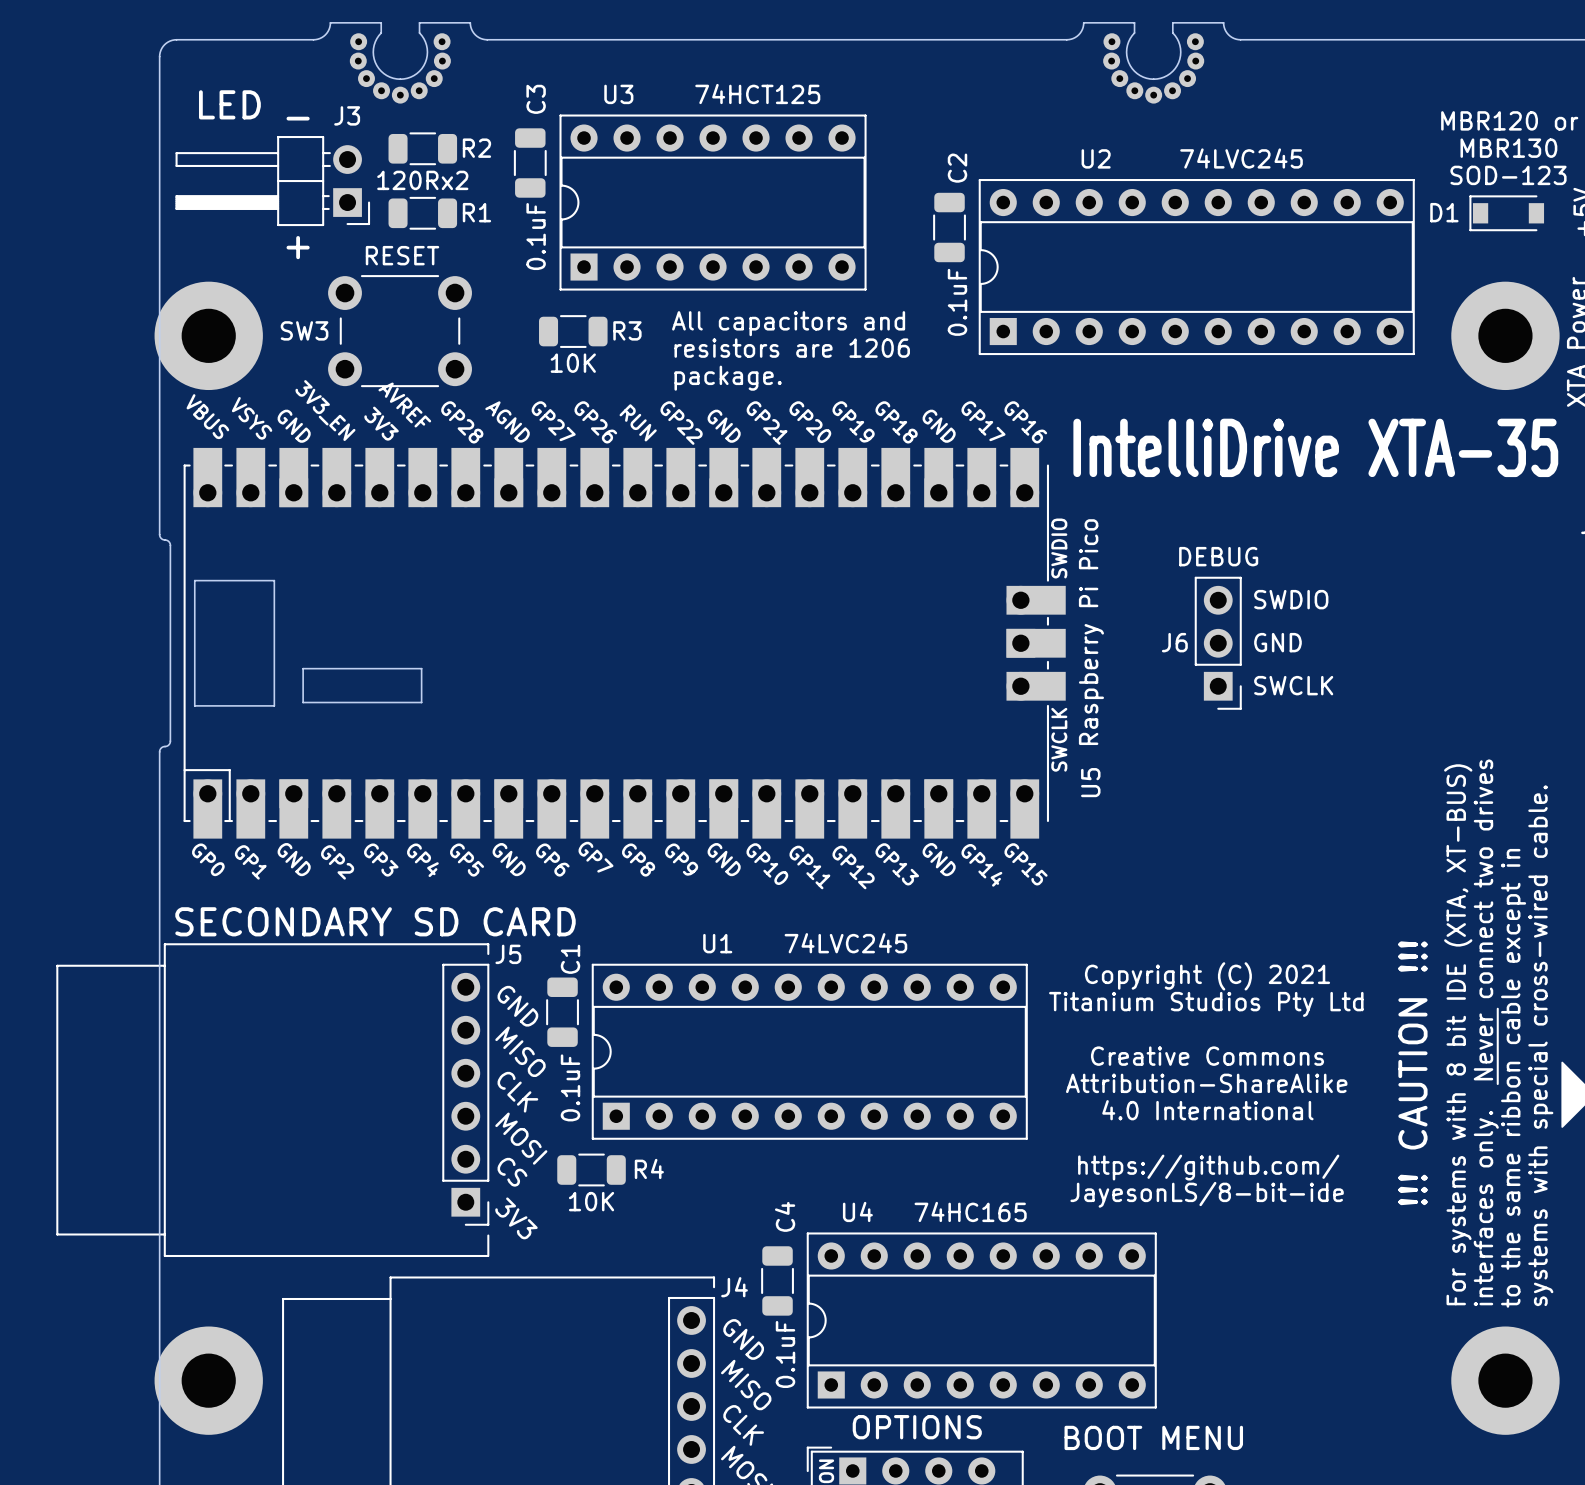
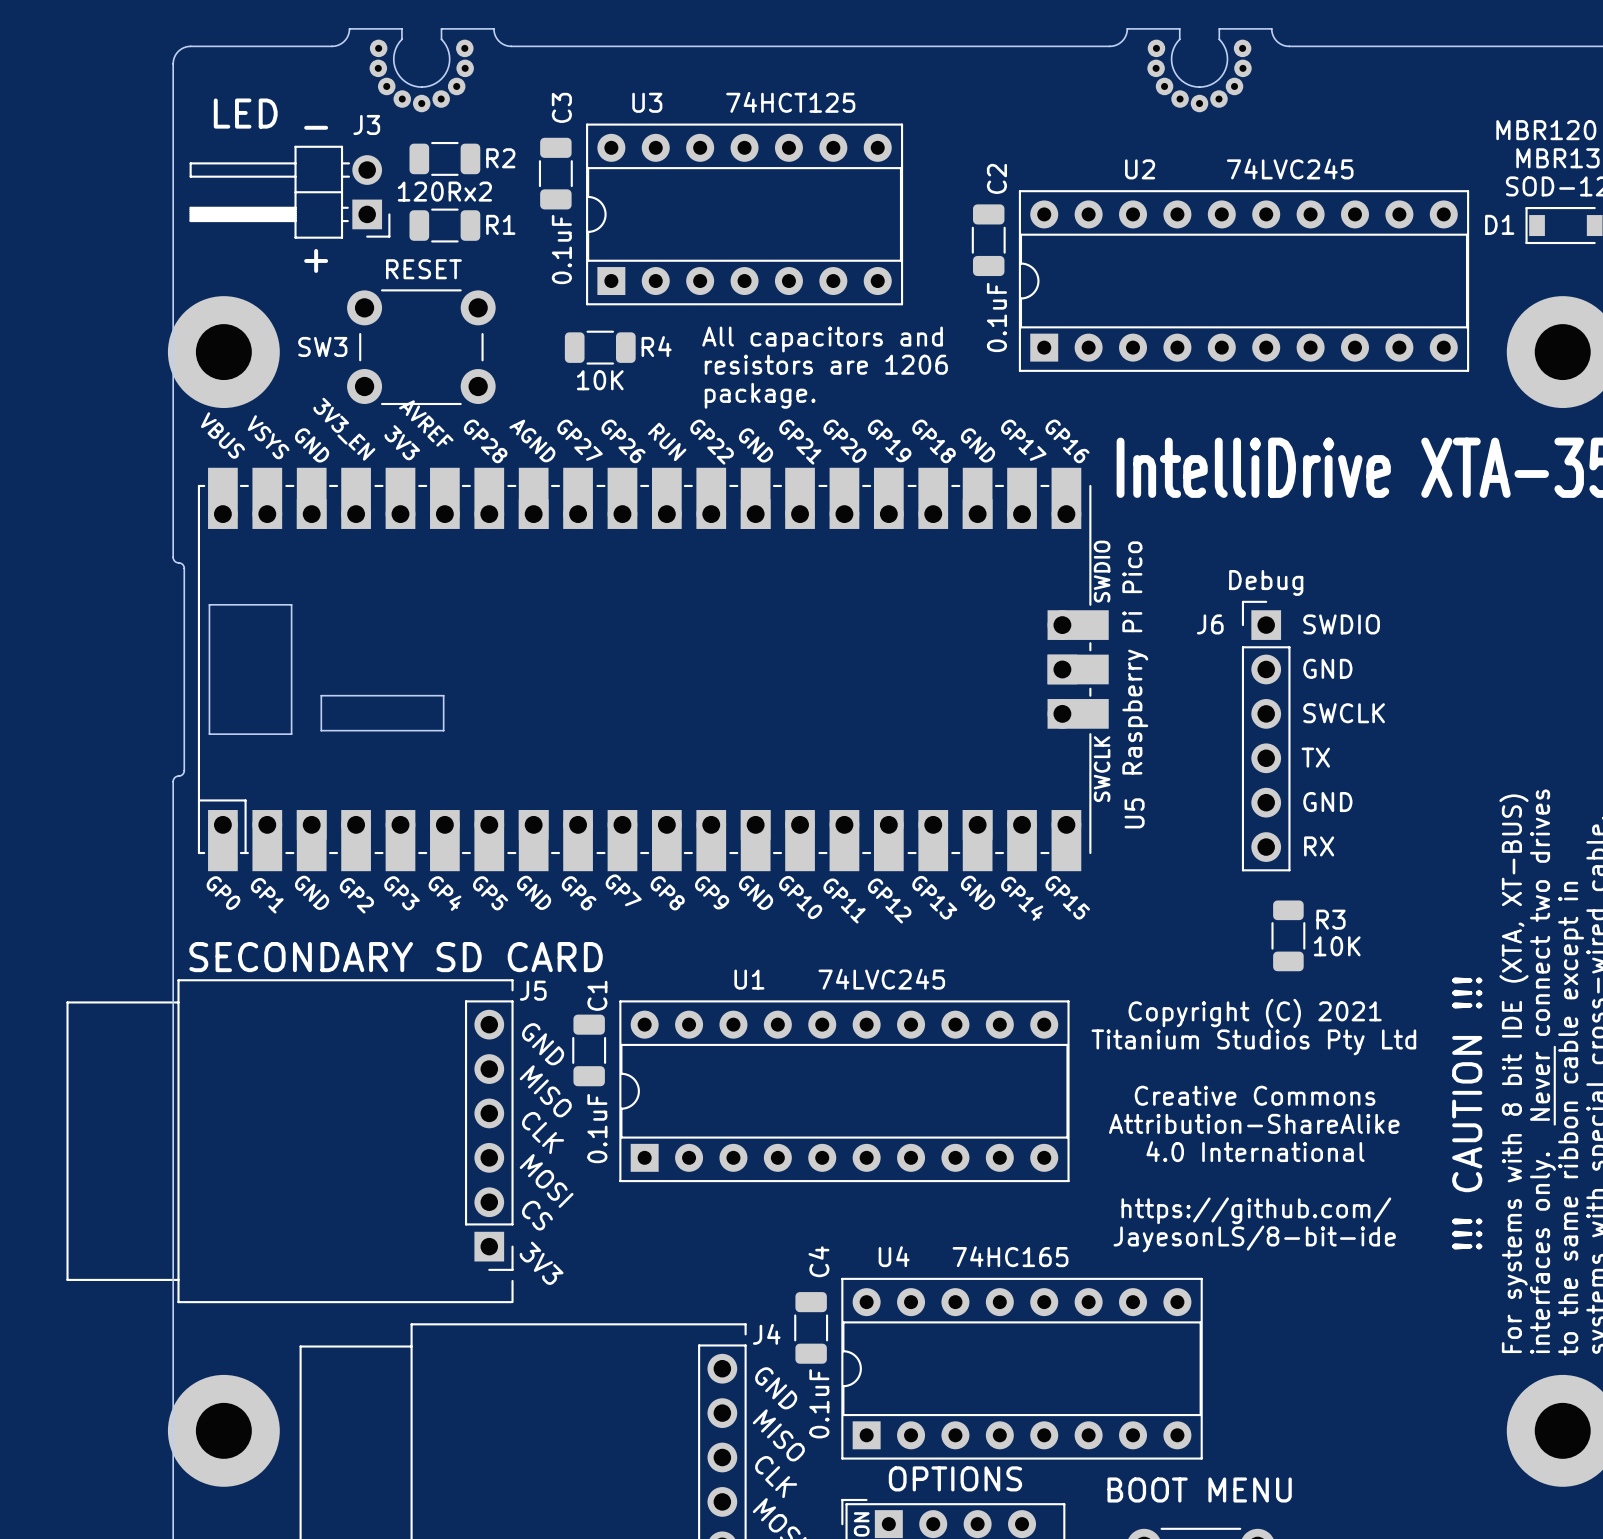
R3 name: R3 (627, 330) -> R4 (656, 346)
J6 value: DEBUG (1218, 556) -> Debug (1266, 582)
J6 footprint: [1194, 576, 1242, 710] -> [1241, 600, 1291, 872]
J6 name position: J6 (1174, 642) -> J6 (1210, 624)
R3: none -> 10K (1288, 935)
R4: 10K (591, 1169) -> none

